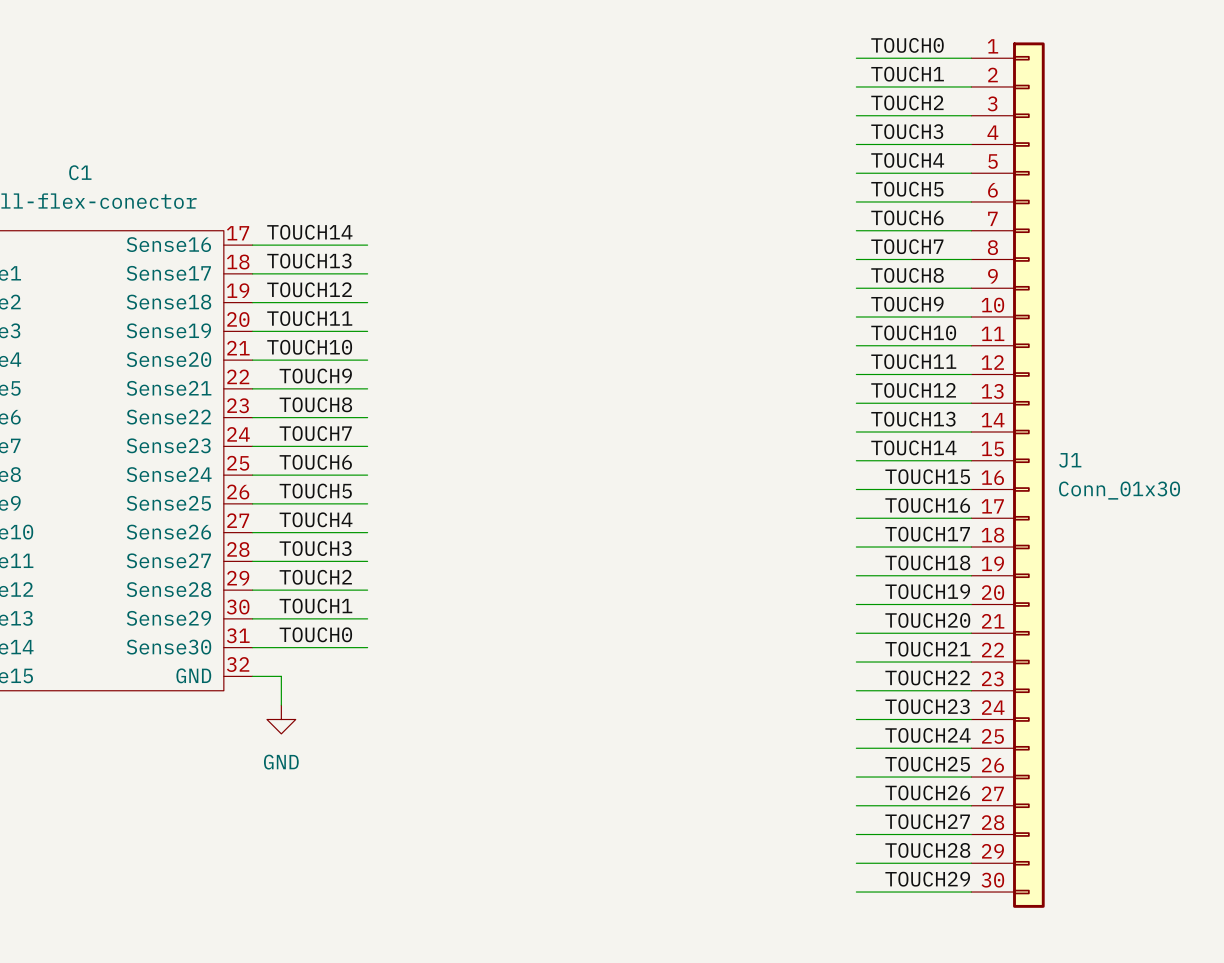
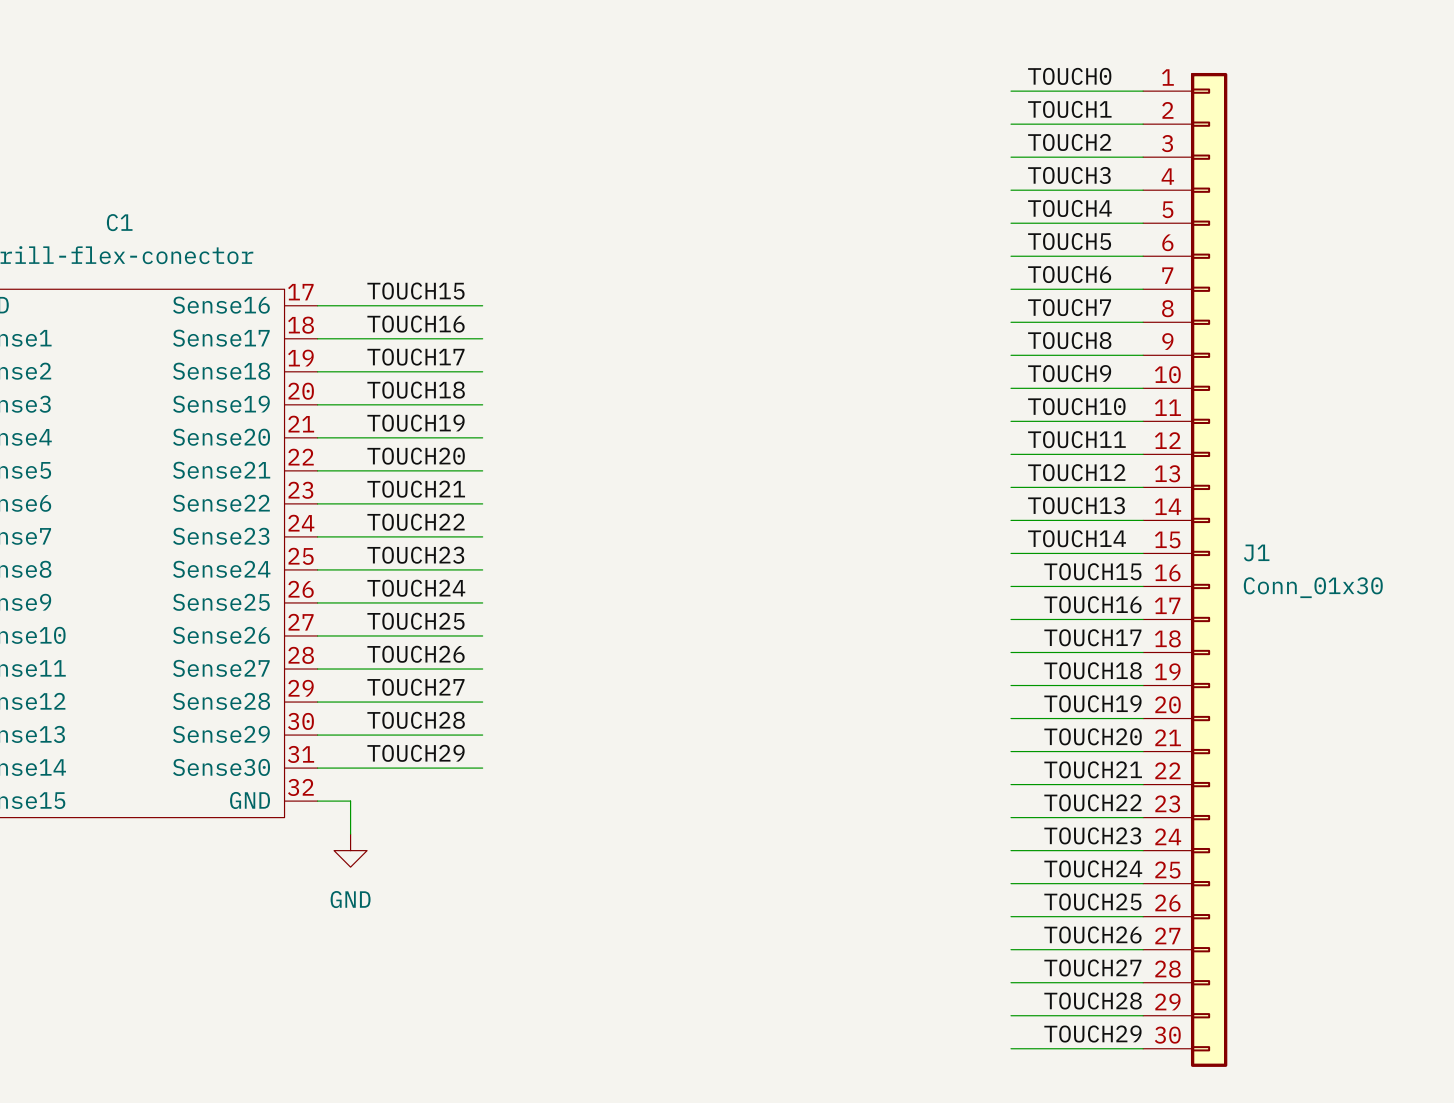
label: TOUCH14 (309, 232) -> none
label: none -> TOUCH15 (415, 291)
wire: none -> (449, 305) (482, 305)
label: TOUCH13 (309, 261) -> none
label: none -> TOUCH16 (416, 324)
wire: none -> (449, 338) (482, 338)
label: TOUCH12 (309, 289) -> none
label: none -> TOUCH17 (415, 357)
wire: none -> (449, 371) (482, 371)
label: TOUCH11 (309, 318) -> none
label: none -> TOUCH18 (416, 390)
wire: none -> (449, 404) (482, 404)
label: TOUCH10 (309, 347) -> none
label: none -> TOUCH19 (416, 423)
wire: none -> (449, 437) (482, 437)
label: TOUCH9 (315, 376) -> none
label: none -> TOUCH20 (416, 456)
wire: none -> (449, 470) (482, 470)
label: TOUCH8 (315, 404) -> none
label: none -> TOUCH21 (416, 489)
wire: none -> (449, 503) (482, 503)
label: TOUCH7 (315, 433) -> none
label: none -> TOUCH22 (416, 522)
wire: none -> (449, 536) (482, 536)
label: TOUCH6 (315, 462) -> none
label: none -> TOUCH23 (415, 555)
wire: none -> (449, 569) (482, 569)
label: TOUCH5 (315, 491) -> none
label: none -> TOUCH24 (416, 588)
wire: none -> (449, 602) (482, 602)
label: TOUCH4 (316, 519) -> none
label: none -> TOUCH25 (415, 621)
wire: none -> (449, 635) (482, 635)
label: TOUCH3 (315, 548) -> none
label: none -> TOUCH26 (416, 654)
wire: none -> (449, 669) (482, 669)
label: TOUCH2 (315, 577) -> none
label: none -> TOUCH27 (415, 687)
wire: none -> (449, 702) (482, 702)
label: TOUCH1 (315, 606) -> none
label: none -> TOUCH28 (416, 720)
wire: none -> (449, 735) (482, 735)
label: TOUCH0 (315, 634) -> none
label: none -> TOUCH29 (416, 753)
wire: none -> (449, 768) (482, 768)

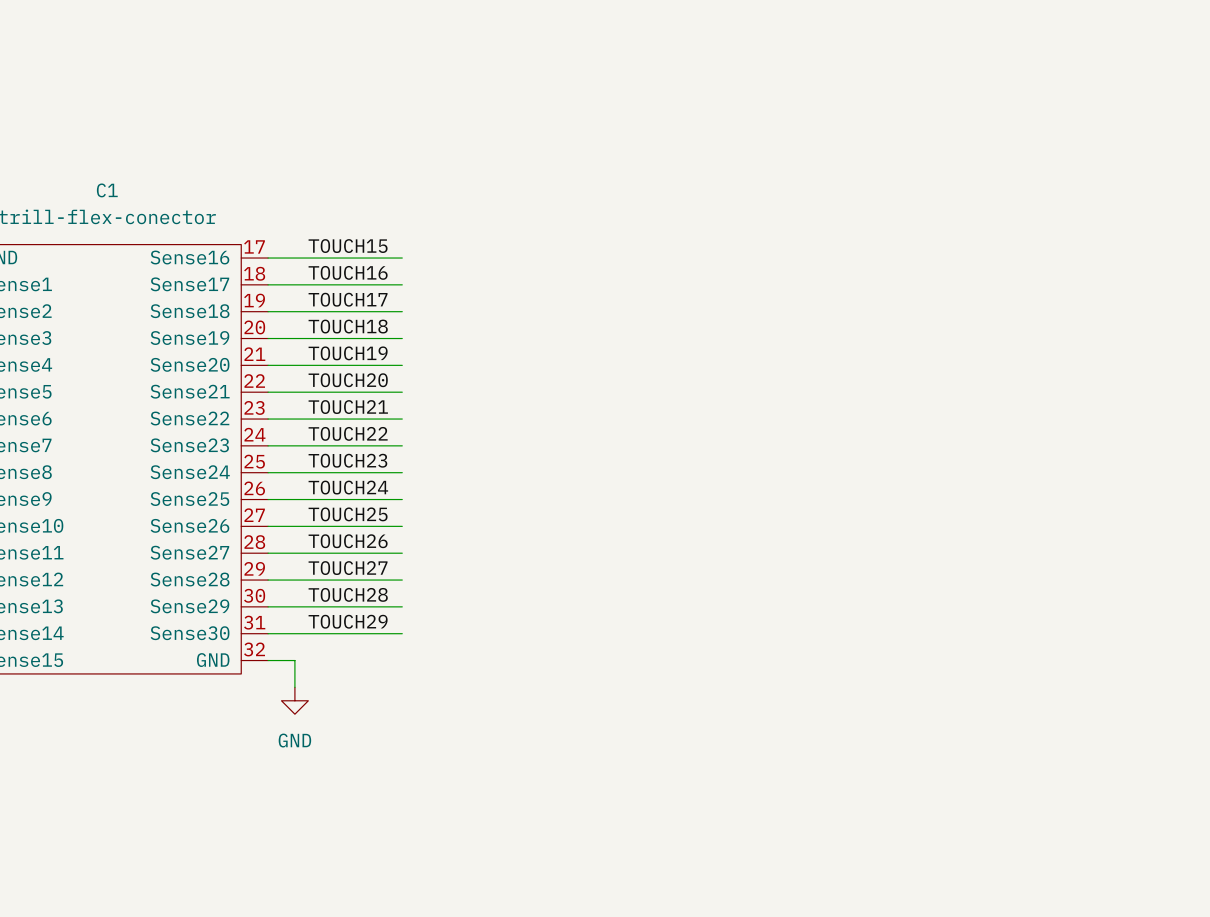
label: TOUCH0 (1069, 76) -> none
wire: (1011, 91) (1143, 91) -> none
label: TOUCH1 (1069, 109) -> none
wire: (1011, 124) (1143, 124) -> none
label: TOUCH2 (1069, 142) -> none
wire: (1011, 157) (1143, 157) -> none
label: TOUCH3 (1069, 175) -> none
wire: (1011, 190) (1143, 190) -> none
label: TOUCH4 (1069, 208) -> none
wire: (1011, 223) (1143, 223) -> none
label: TOUCH5 (1069, 241) -> none
wire: (1011, 256) (1143, 256) -> none
label: TOUCH6 (1069, 274) -> none
wire: (1011, 289) (1143, 289) -> none
label: TOUCH7 (1069, 307) -> none
wire: (1011, 322) (1143, 322) -> none
label: TOUCH8 (1069, 340) -> none
wire: (1011, 355) (1143, 355) -> none
label: TOUCH9 (1069, 373) -> none
wire: (1011, 388) (1143, 388) -> none
label: TOUCH10 (1076, 406) -> none
wire: (1011, 421) (1143, 421) -> none
label: TOUCH11 (1076, 439) -> none
wire: (1011, 454) (1143, 454) -> none
label: TOUCH12 (1076, 472) -> none
wire: (1011, 487) (1143, 487) -> none
label: TOUCH13 (1076, 505) -> none
wire: (1011, 520) (1143, 520) -> none
label: TOUCH14 (1077, 538) -> none
wire: (1011, 553) (1143, 553) -> none
J1: Conn_01x30 (1185, 569) -> none
label: TOUCH15 (1092, 571) -> none
wire: (1011, 586) (1143, 586) -> none
label: TOUCH16 (1092, 604) -> none
wire: (1011, 619) (1143, 619) -> none
label: TOUCH17 (1092, 637) -> none
wire: (1011, 652) (1143, 652) -> none
label: TOUCH18 (1093, 670) -> none
wire: (1011, 685) (1143, 685) -> none
label: TOUCH19 (1092, 703) -> none
wire: (1011, 718) (1143, 718) -> none
label: TOUCH20 (1093, 736) -> none
wire: (1011, 751) (1143, 751) -> none
label: TOUCH21 (1093, 769) -> none
wire: (1011, 784) (1143, 784) -> none
label: TOUCH22 (1092, 802) -> none
wire: (1011, 817) (1143, 817) -> none
label: TOUCH23 (1092, 835) -> none
wire: (1011, 850) (1143, 850) -> none
label: TOUCH24 (1093, 868) -> none
wire: (1011, 883) (1143, 883) -> none
label: TOUCH25 (1092, 901) -> none
wire: (1011, 916) (1143, 916) -> none
label: TOUCH26 (1092, 934) -> none
wire: (1011, 949) (1143, 949) -> none
label: TOUCH27 (1092, 967) -> none
wire: (1011, 982) (1143, 982) -> none
label: TOUCH28 (1093, 1001) -> none
wire: (1011, 1015) (1143, 1015) -> none
label: TOUCH29 (1092, 1034) -> none
wire: (1011, 1048) (1143, 1048) -> none

